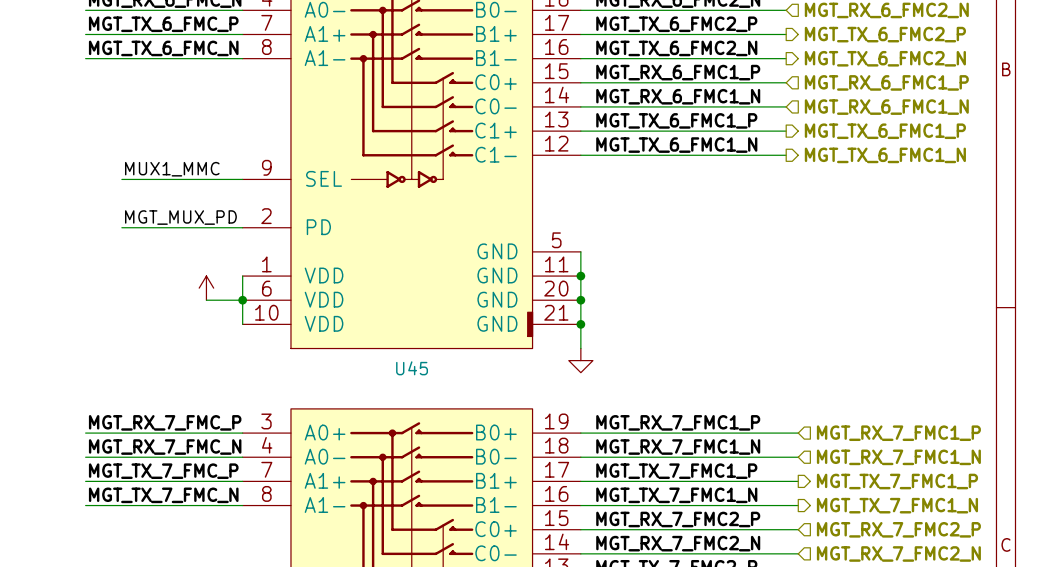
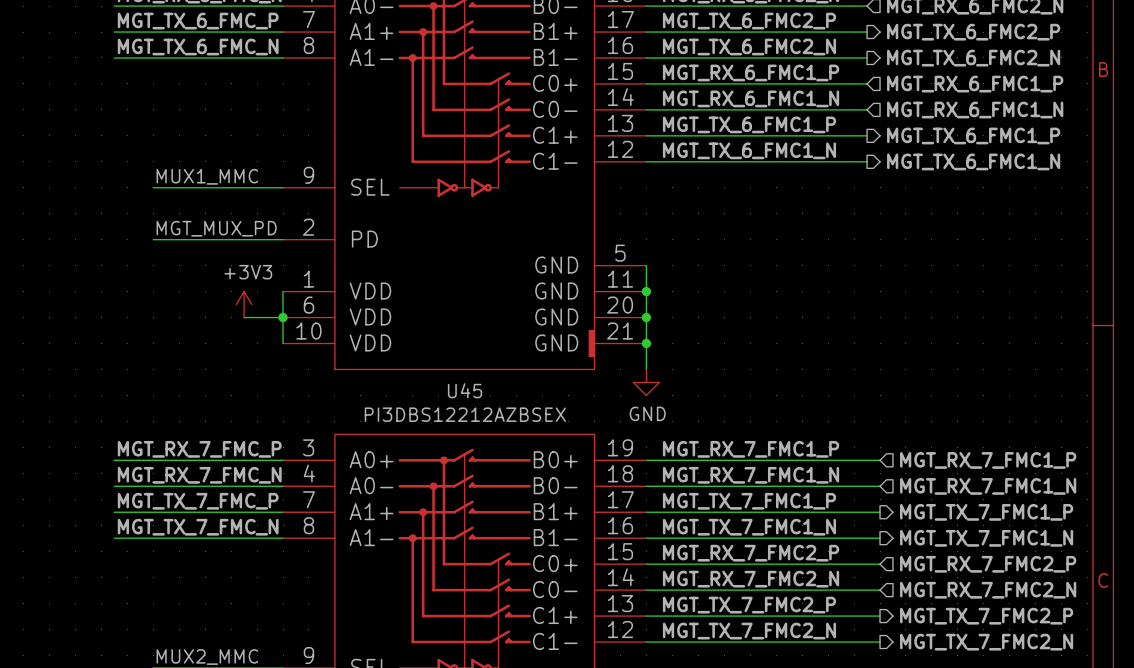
power symbol text: none -> +3V3 (248, 272)
power symbol text: none -> GND (647, 413)
U45 value: none -> PI3DBS12212AZBSEX (465, 414)

